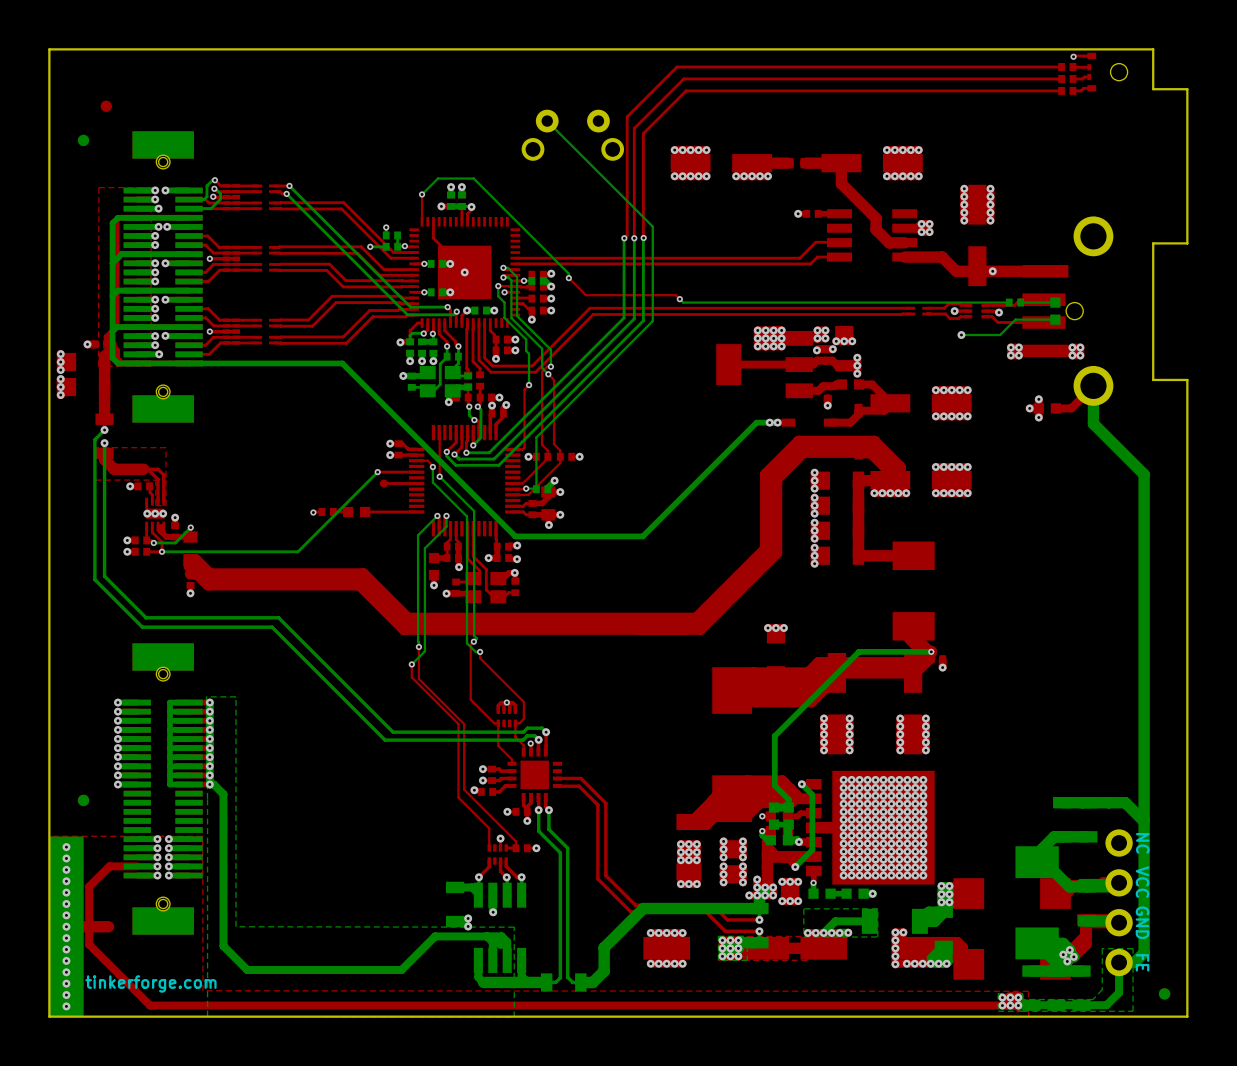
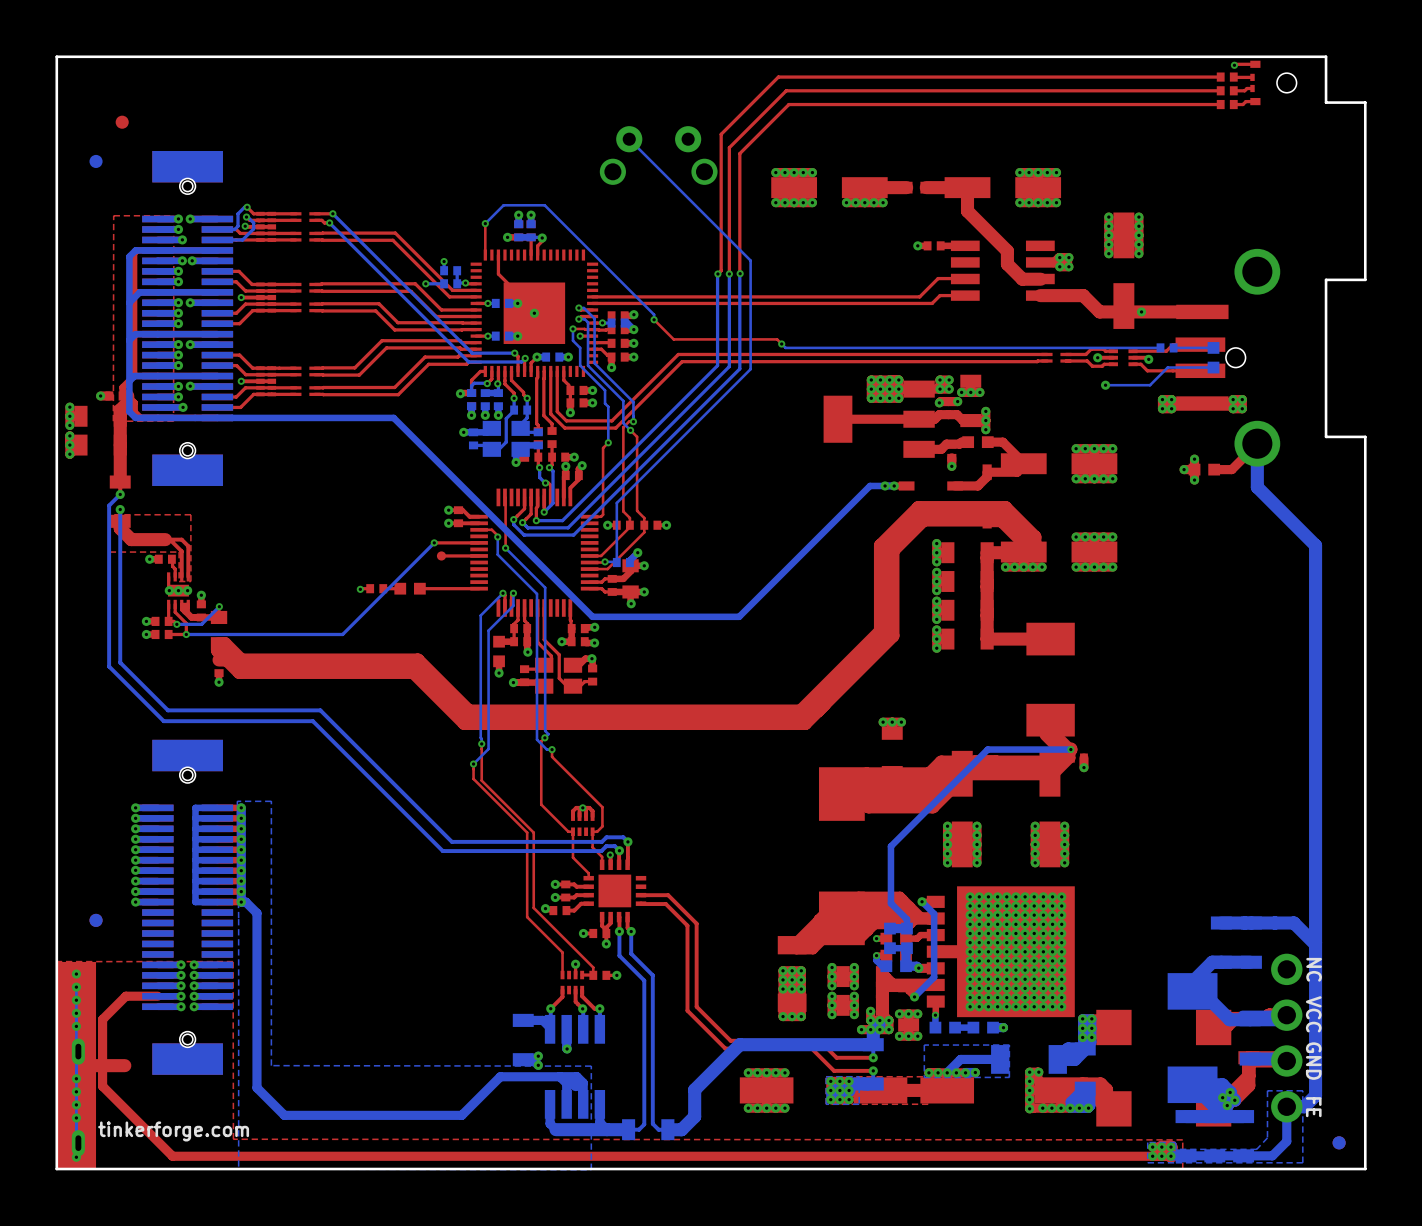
part footprint: [49, 836, 84, 1017] -> [56, 961, 97, 1170]
via: (66, 903) -> none
via: (66, 915) -> none
via: (66, 926) -> none
via: (66, 983) -> none
via: (66, 995) -> none

